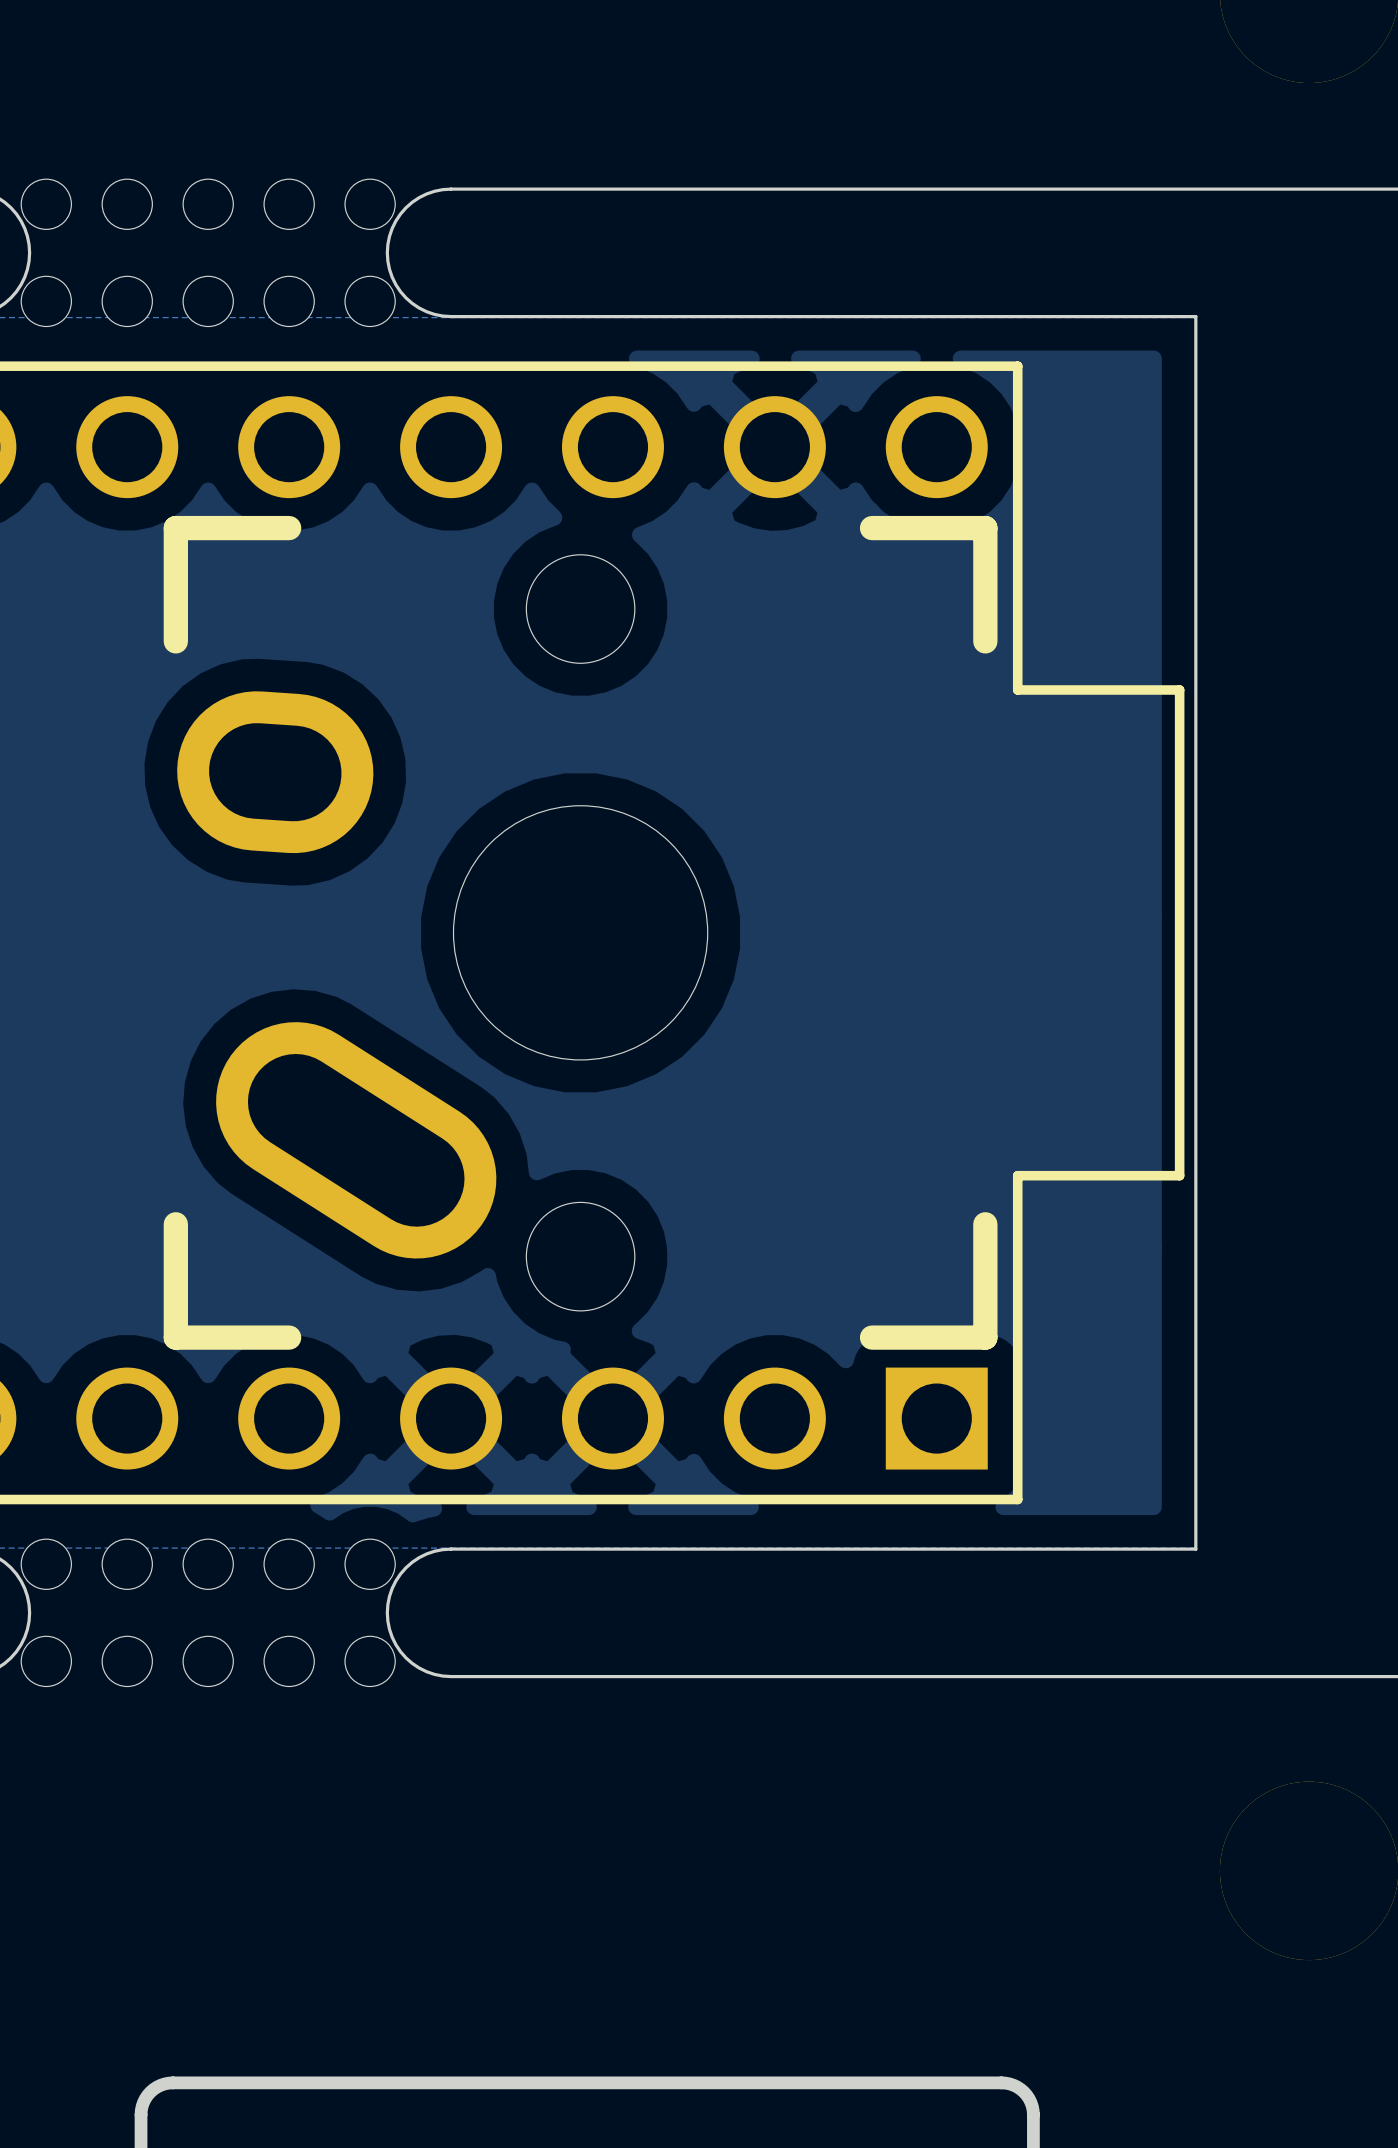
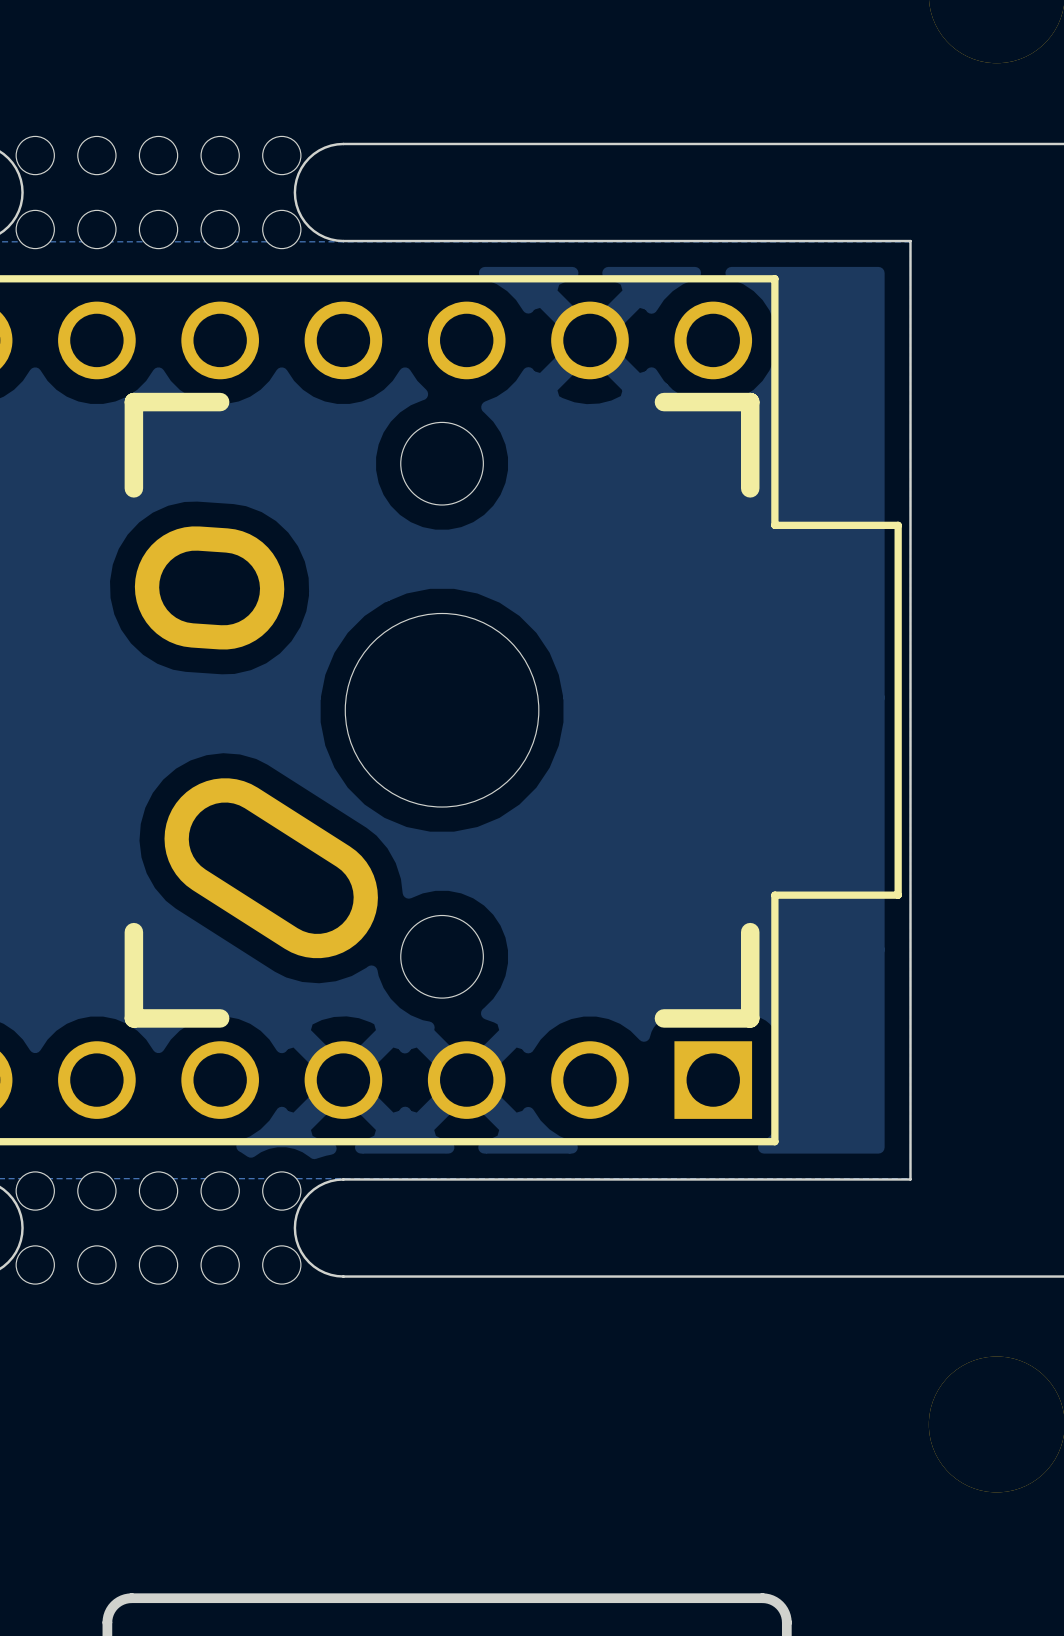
board edge: (1033, 2130) (1033, 2110) (1029, 2098) (1017, 2087) (1001, 2082) (172, 2082) (156, 2087) (145, 2098) (141, 2110) (141, 2130) -> (786, 1622) (784, 1613) (779, 1605) (771, 1600) (762, 1598) (131, 1598) (122, 1600) (114, 1605) (109, 1613) (107, 1622)

